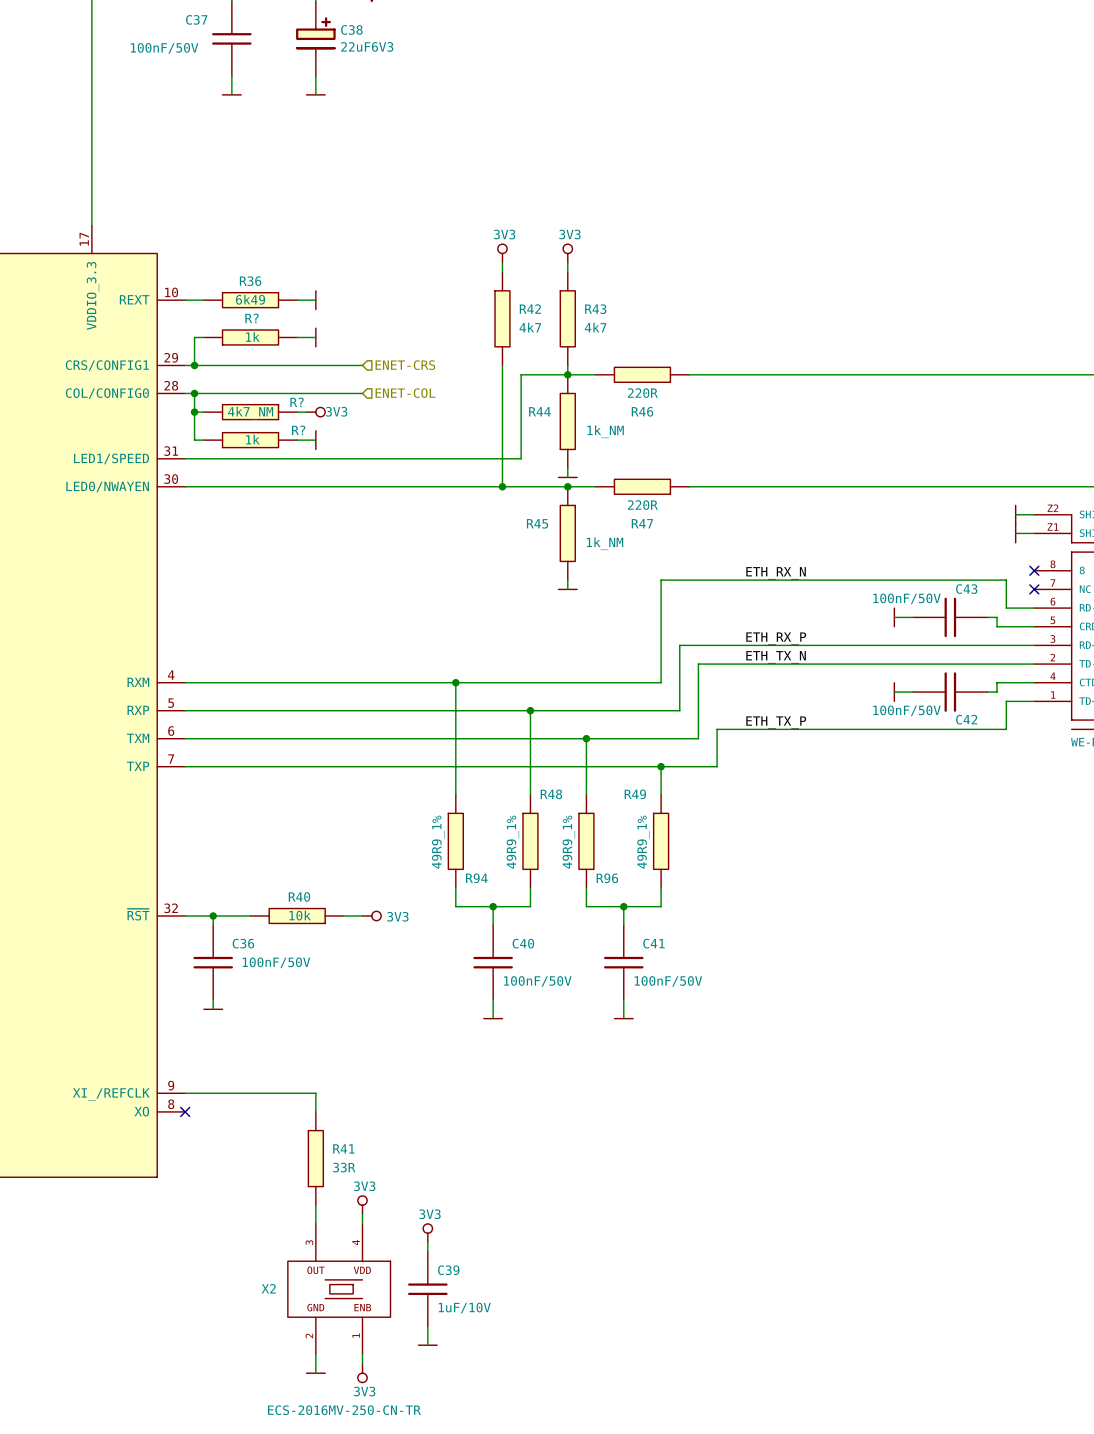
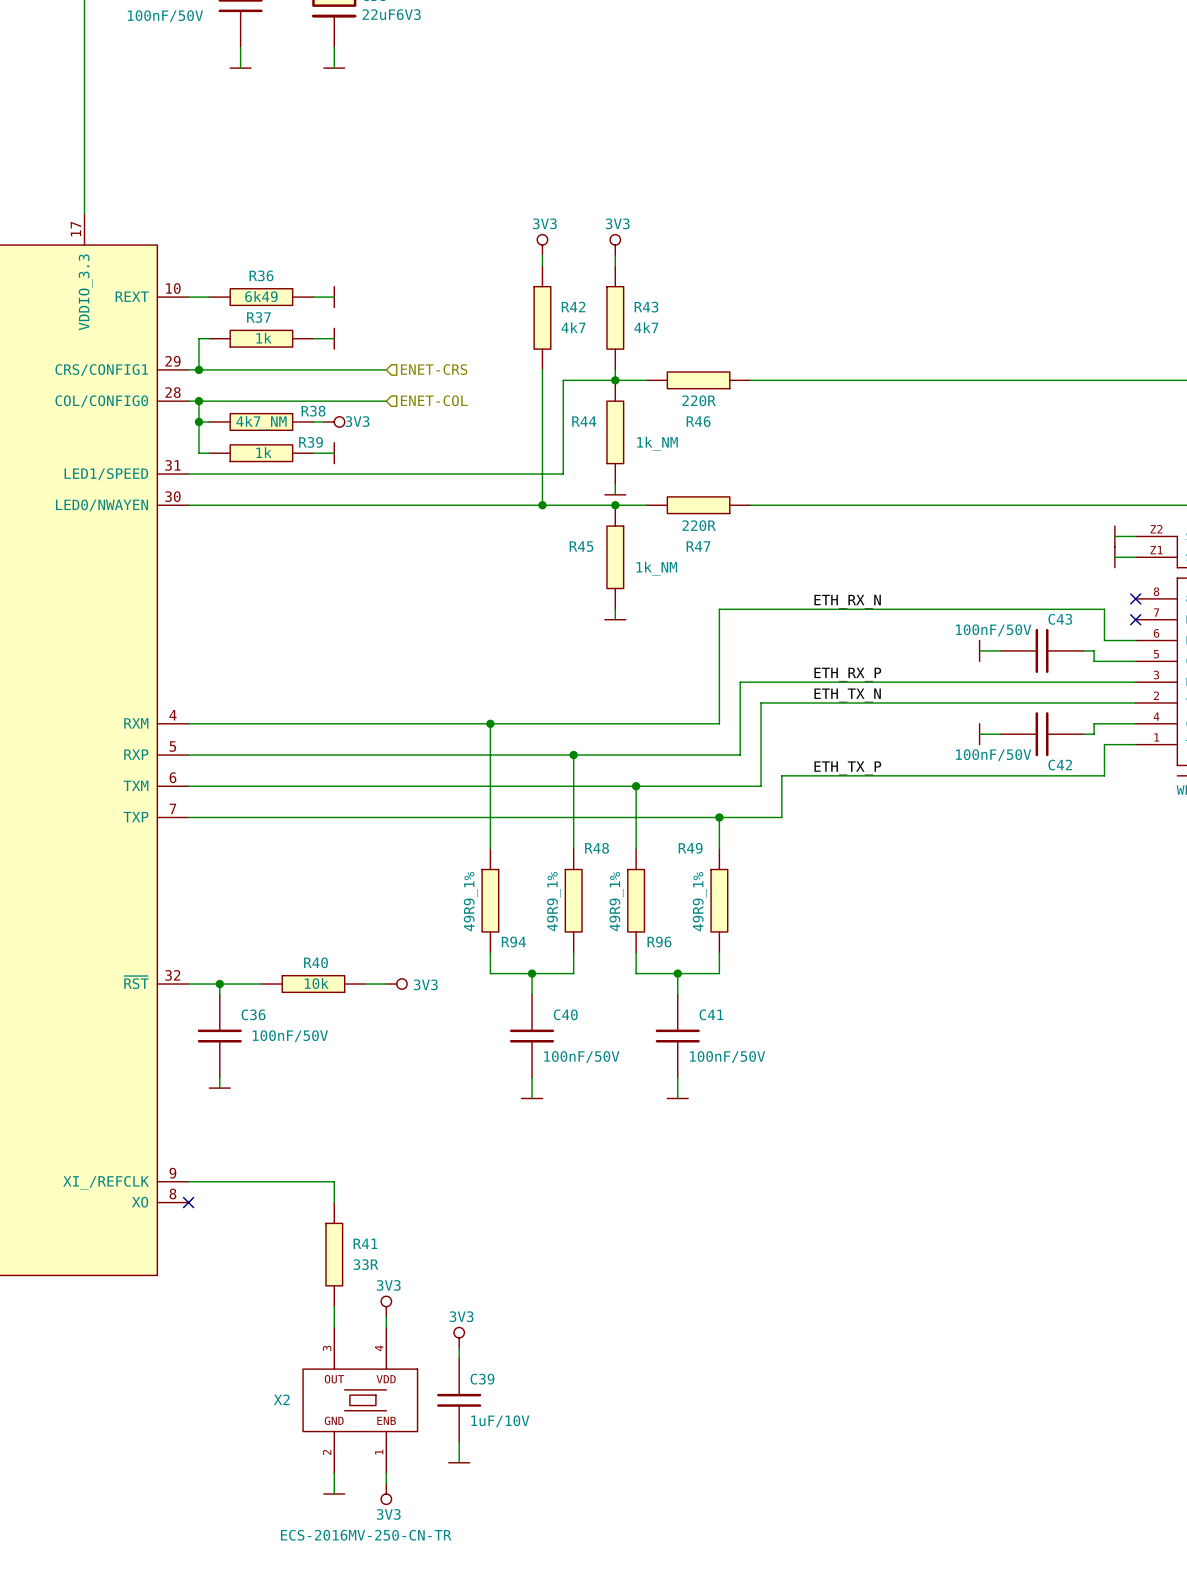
R? name: R? (252, 318) -> R37 (258, 317)
R? name: R? (297, 402) -> R38 (313, 411)
R? name: R? (298, 430) -> R39 (311, 442)

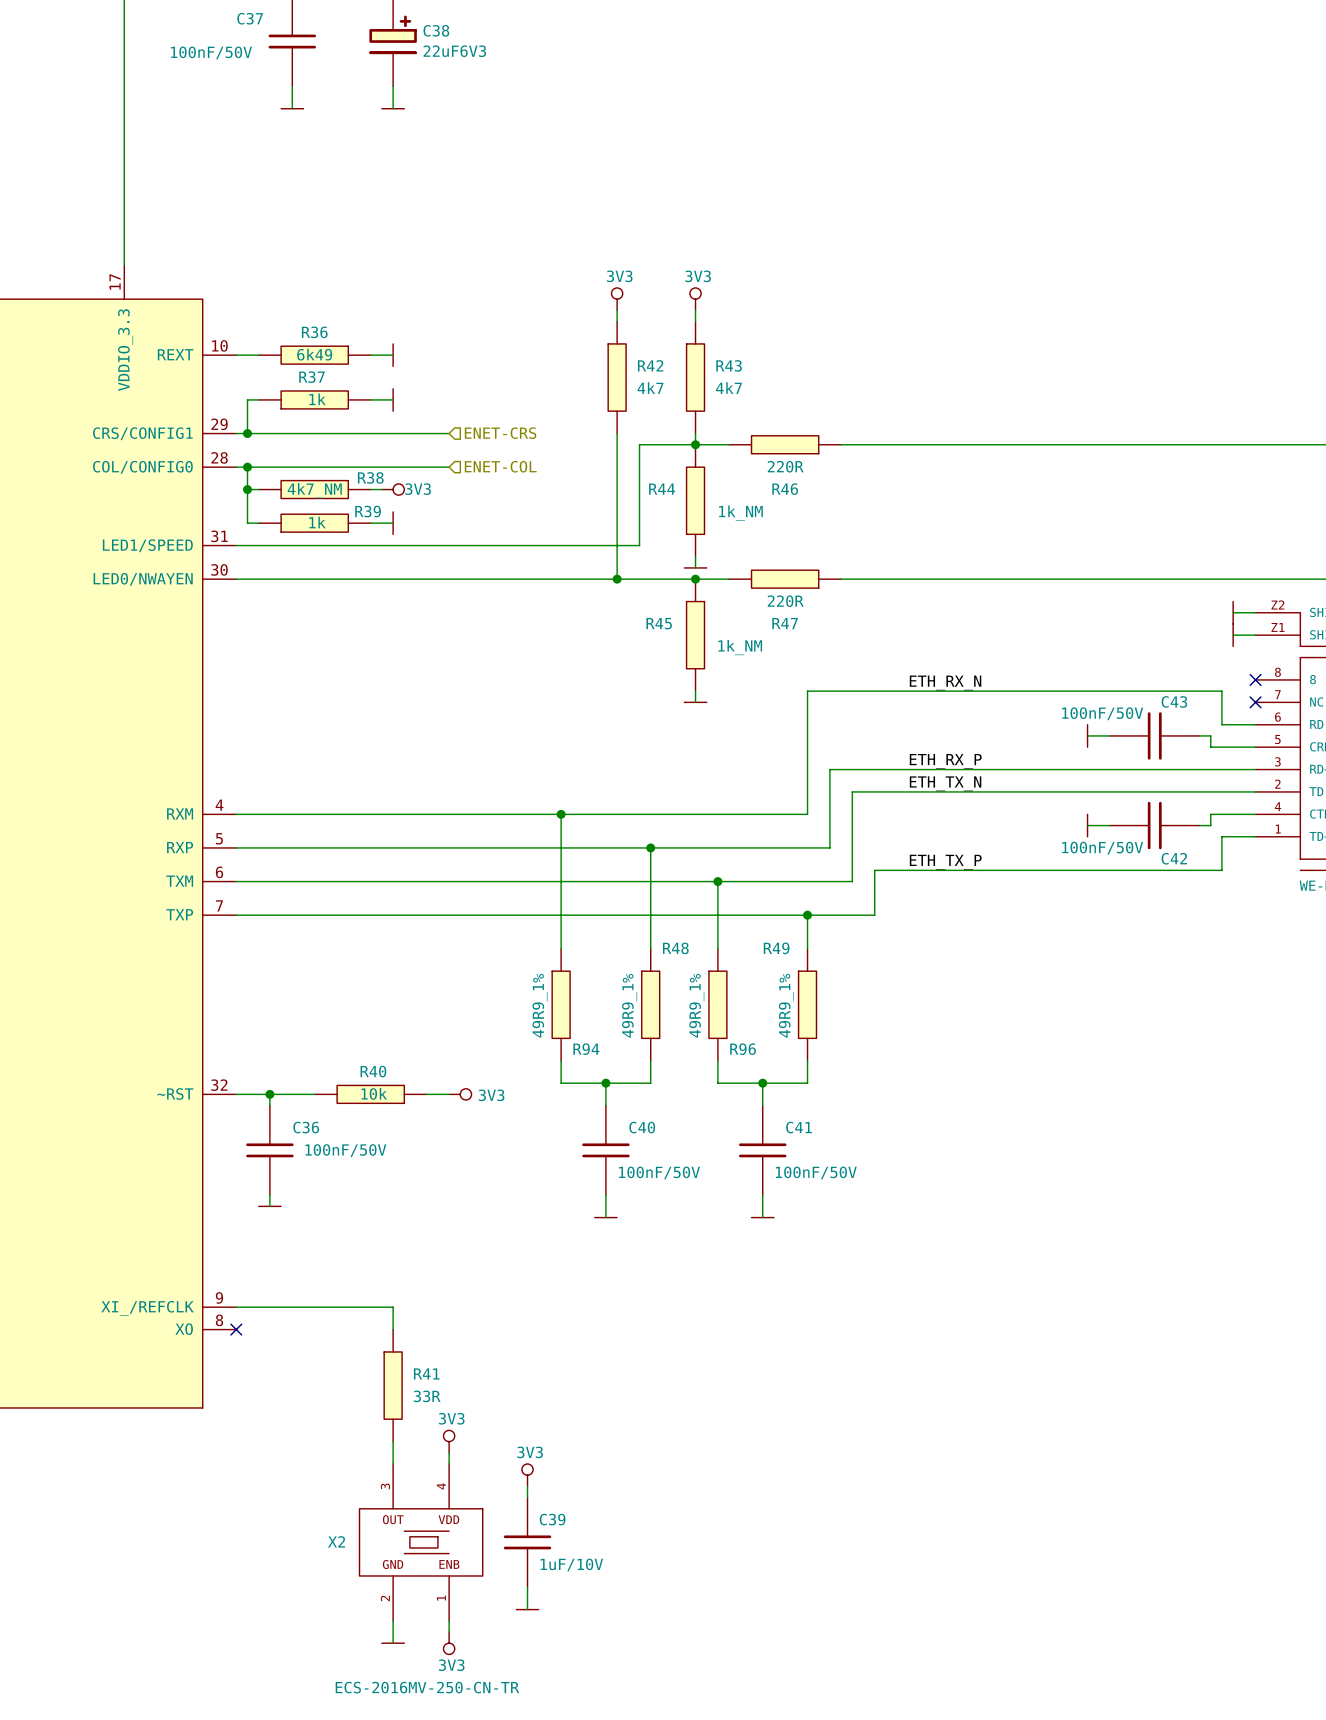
part pin name: ~{RST} (136, 982) -> ~RST (175, 1093)

